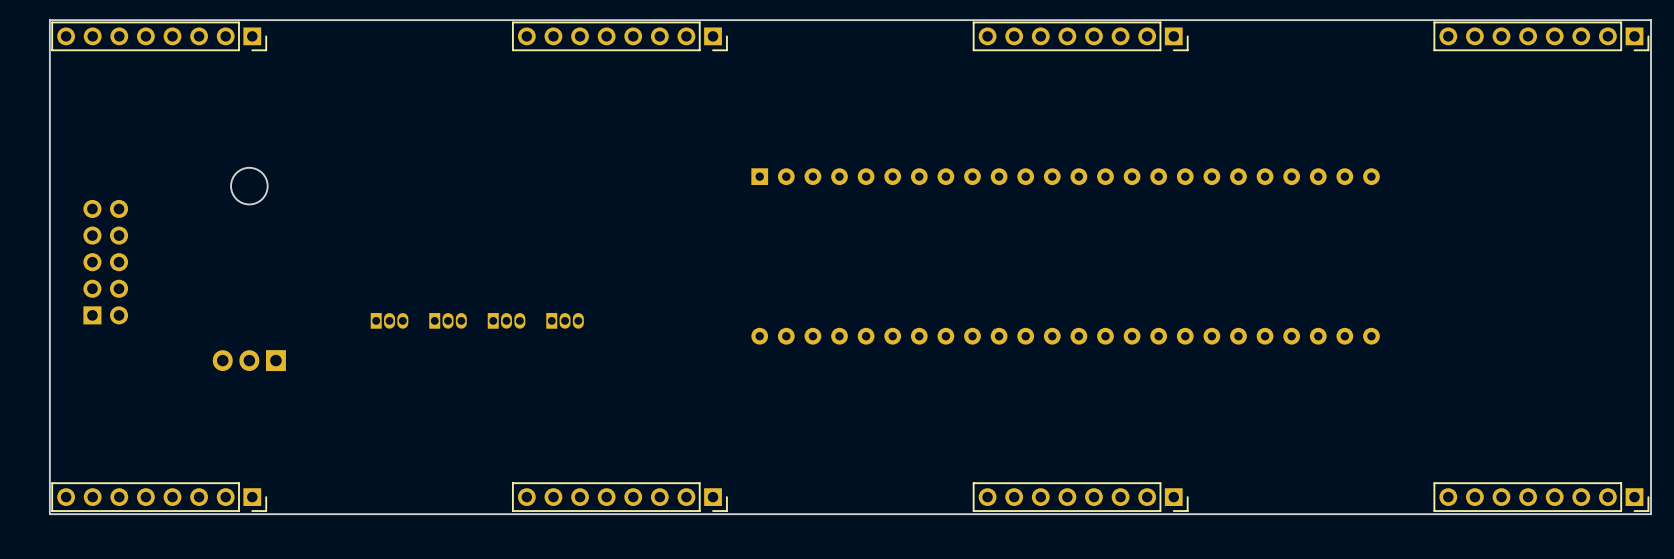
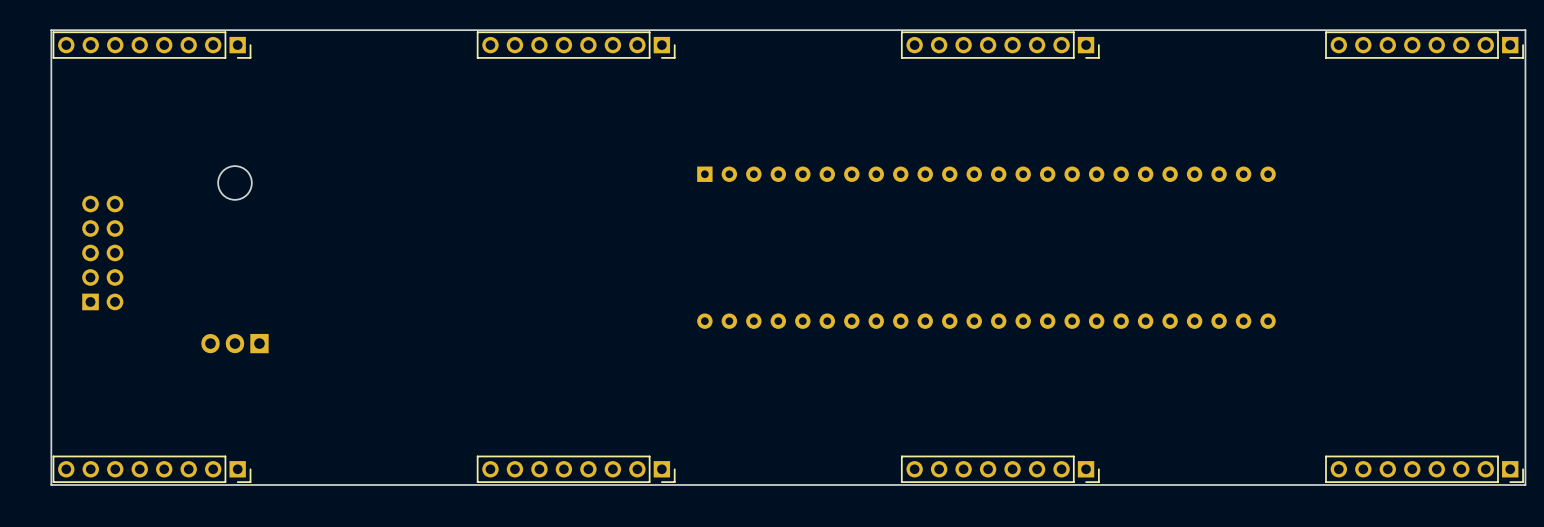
part: (389, 320) -> none
part: (448, 320) -> none
part: (506, 320) -> none
part: (565, 320) -> none

